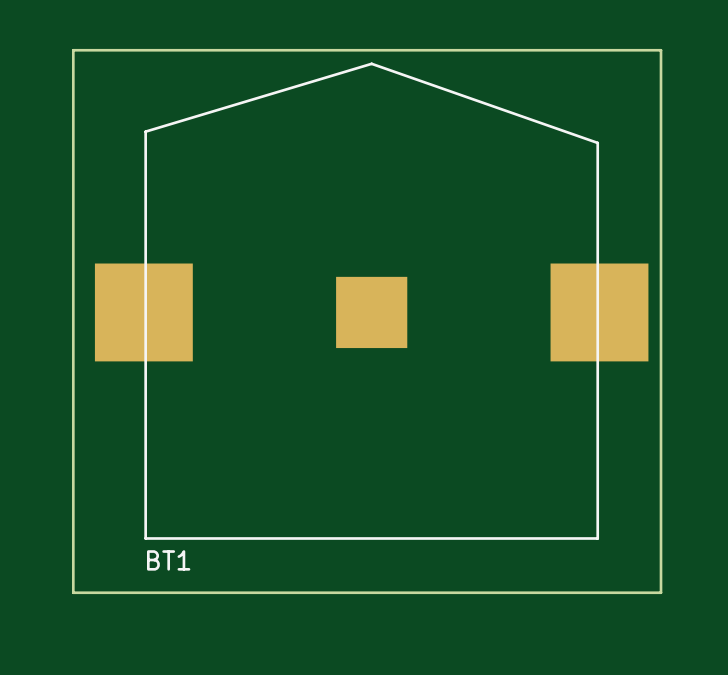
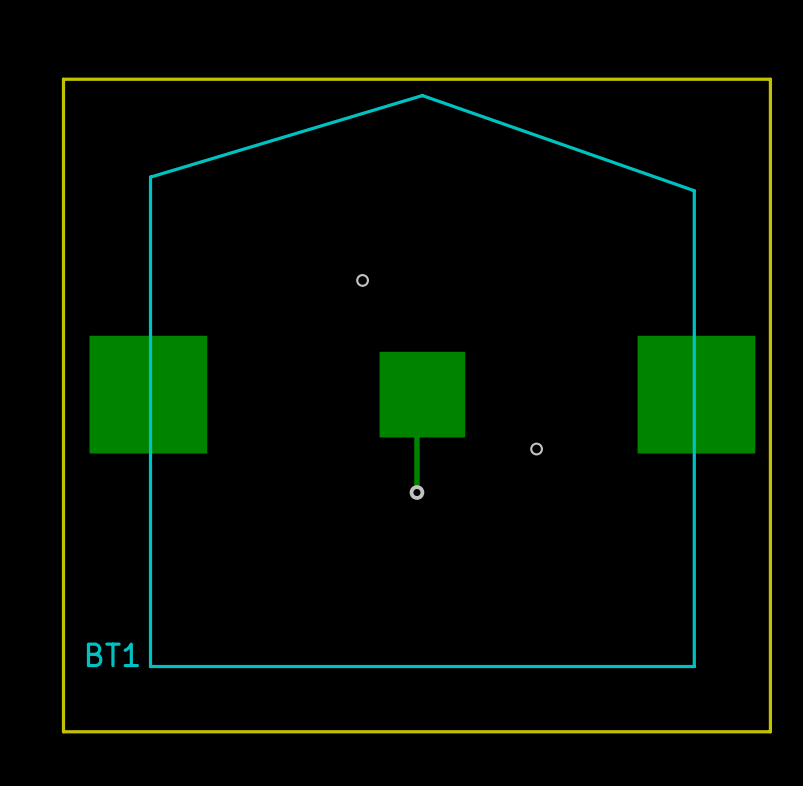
via: none -> (362, 280)
track: none -> (416, 394) (416, 492)
via: none -> (536, 449)
via: none -> (416, 492)
BT1 name position: BT1 (168, 560) -> BT1 (112, 654)

